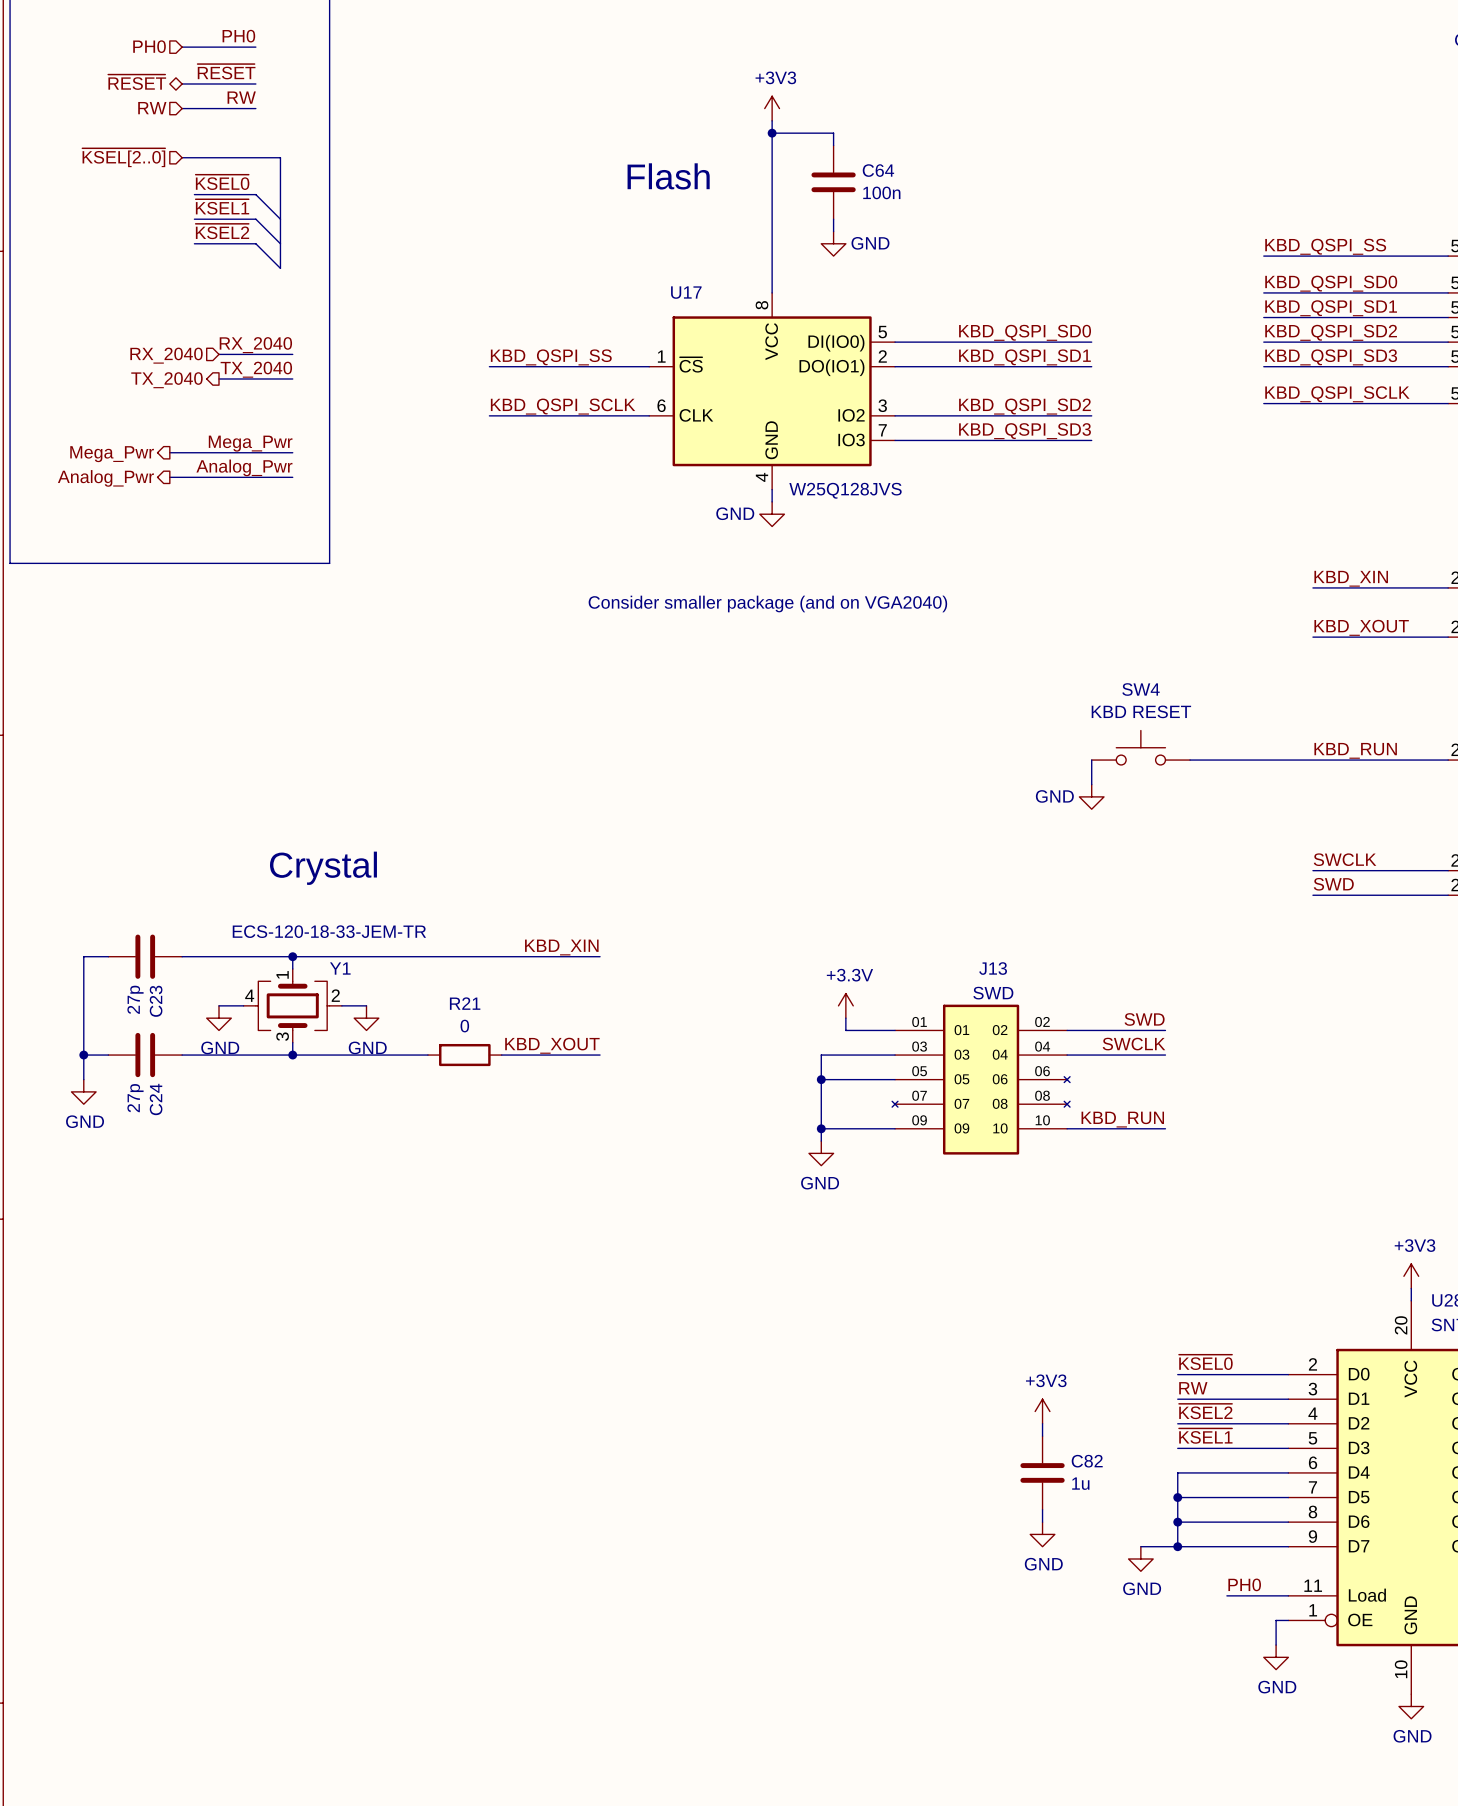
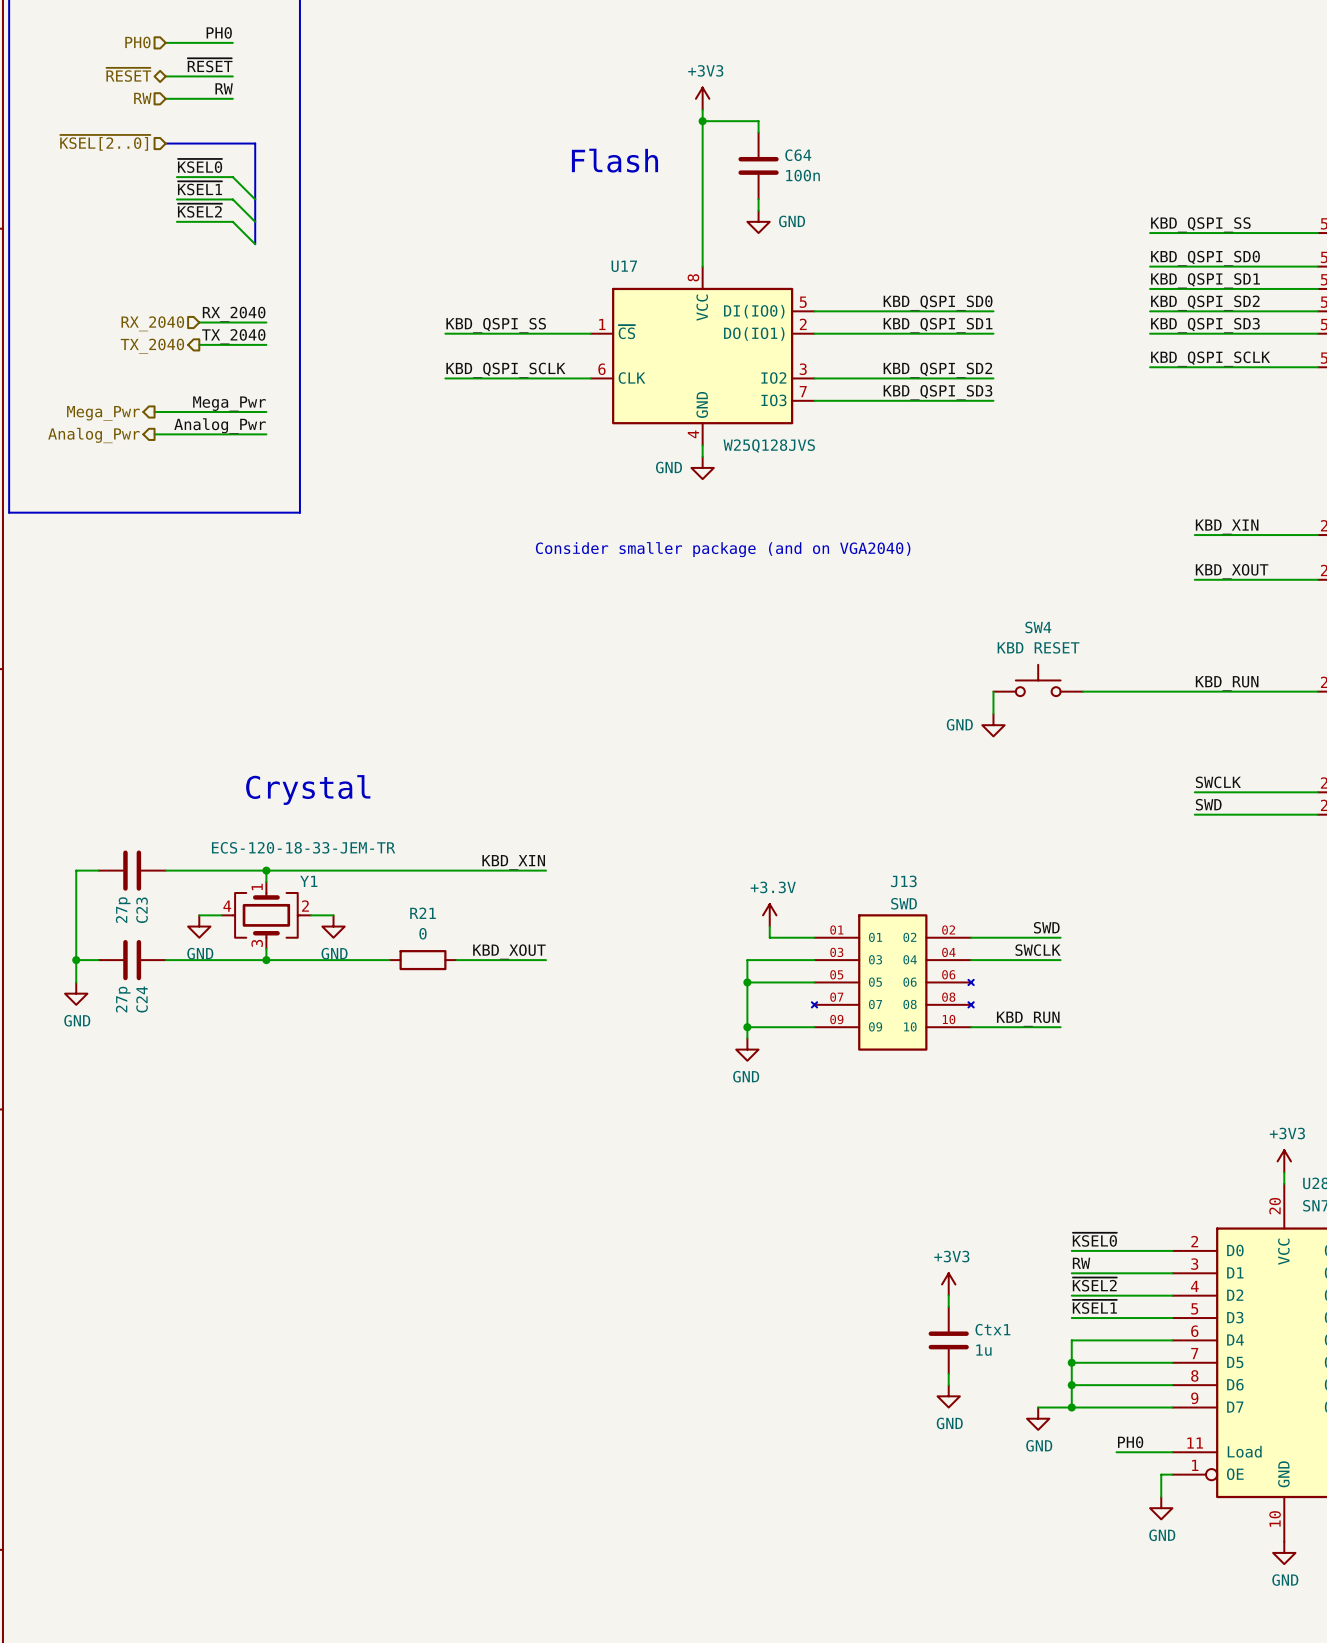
C82 name: C82 (1087, 1461) -> Ctx1 (992, 1329)

